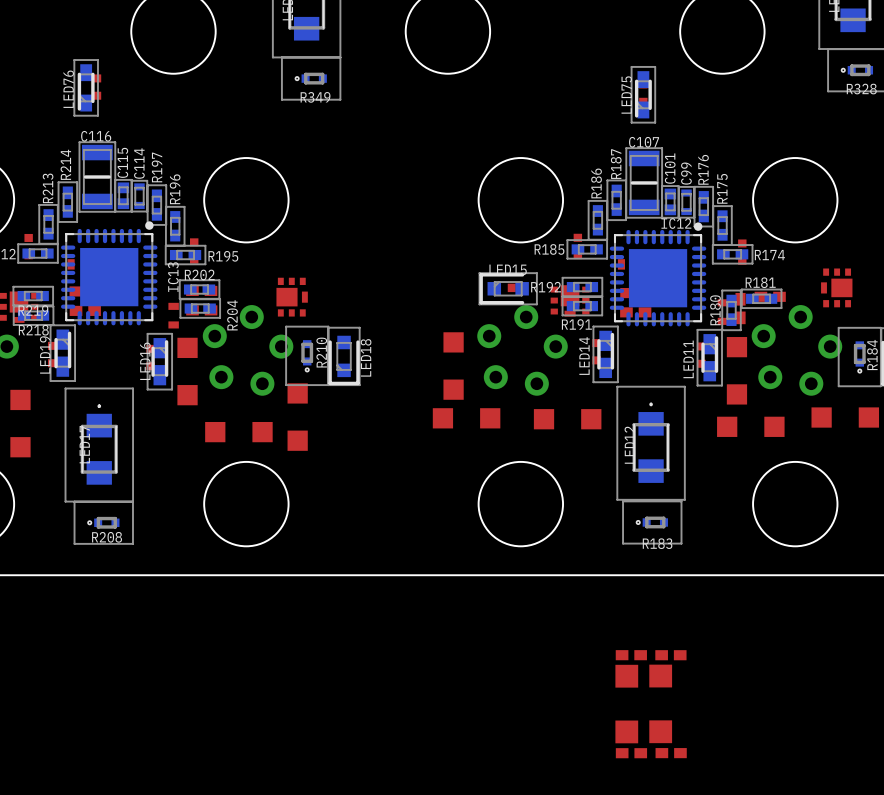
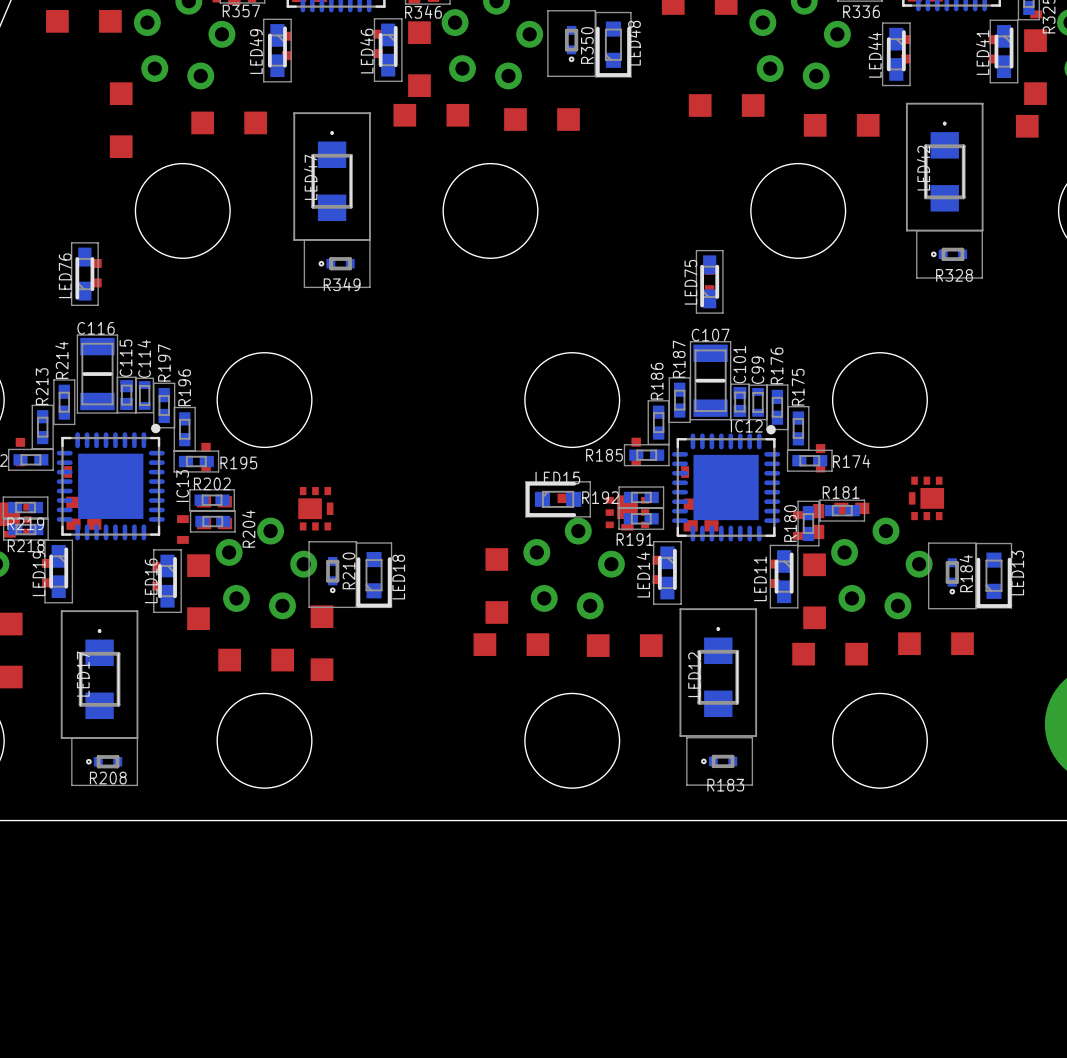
part: (631, 655) -> none
part: (670, 655) -> none
part: (660, 703) -> none
part: (626, 704) -> none
part: (631, 753) -> none
part: (671, 753) -> none

